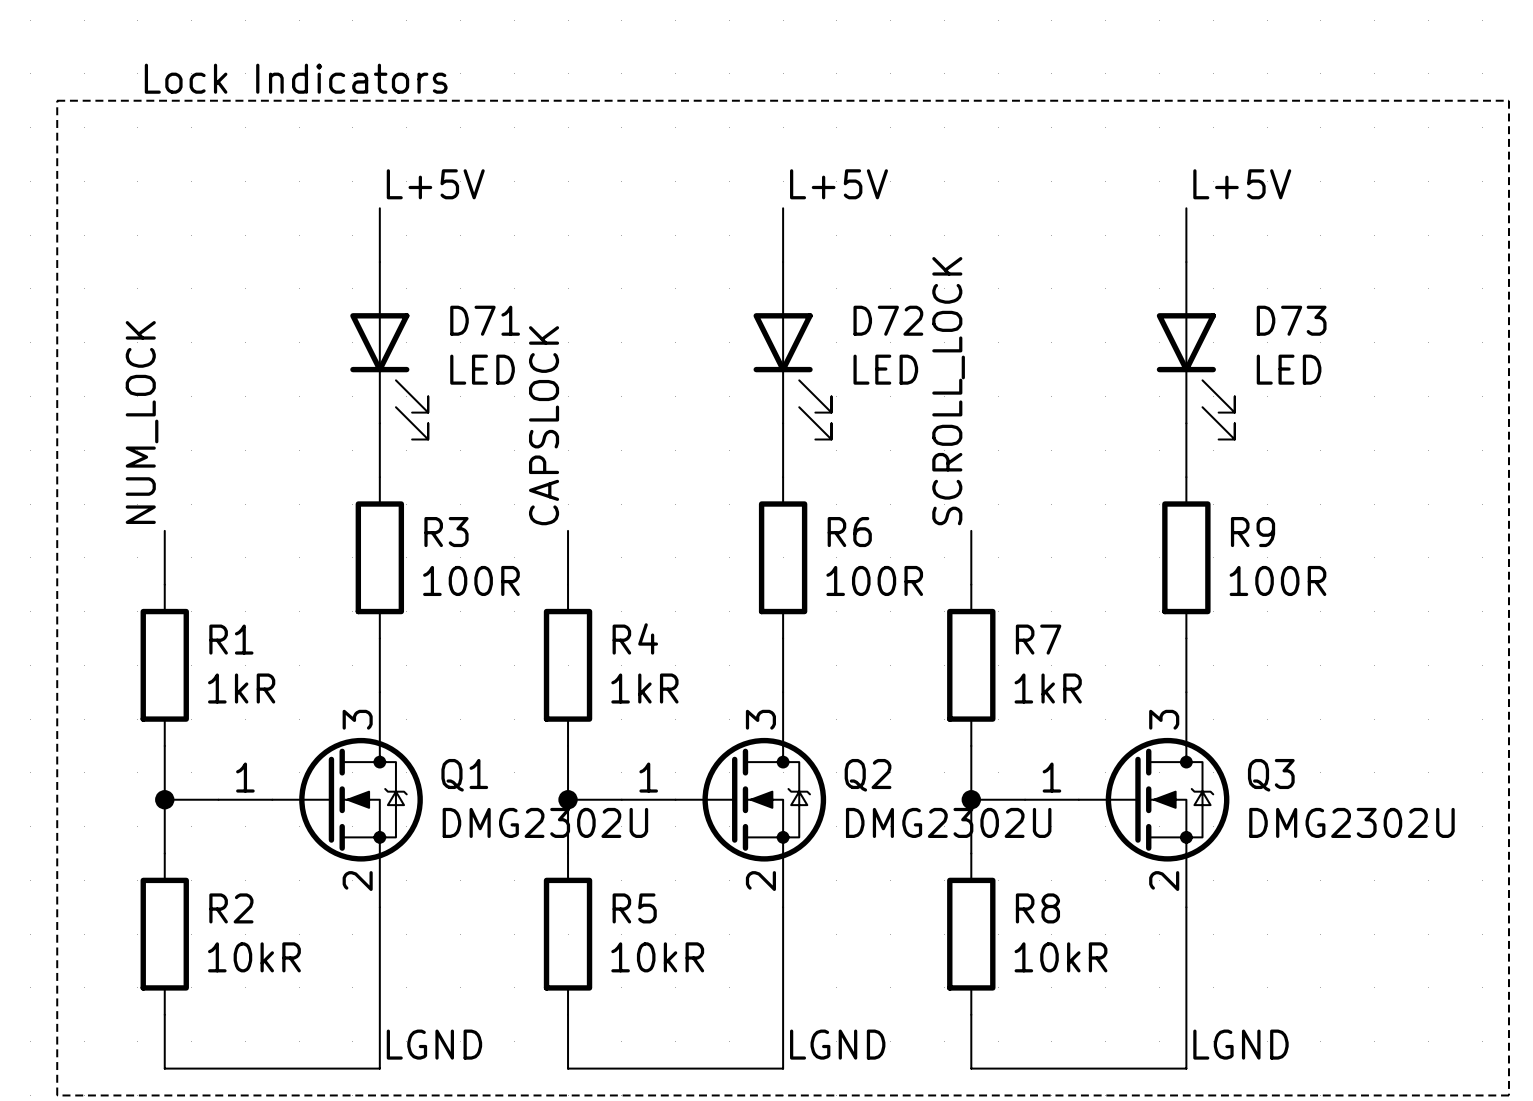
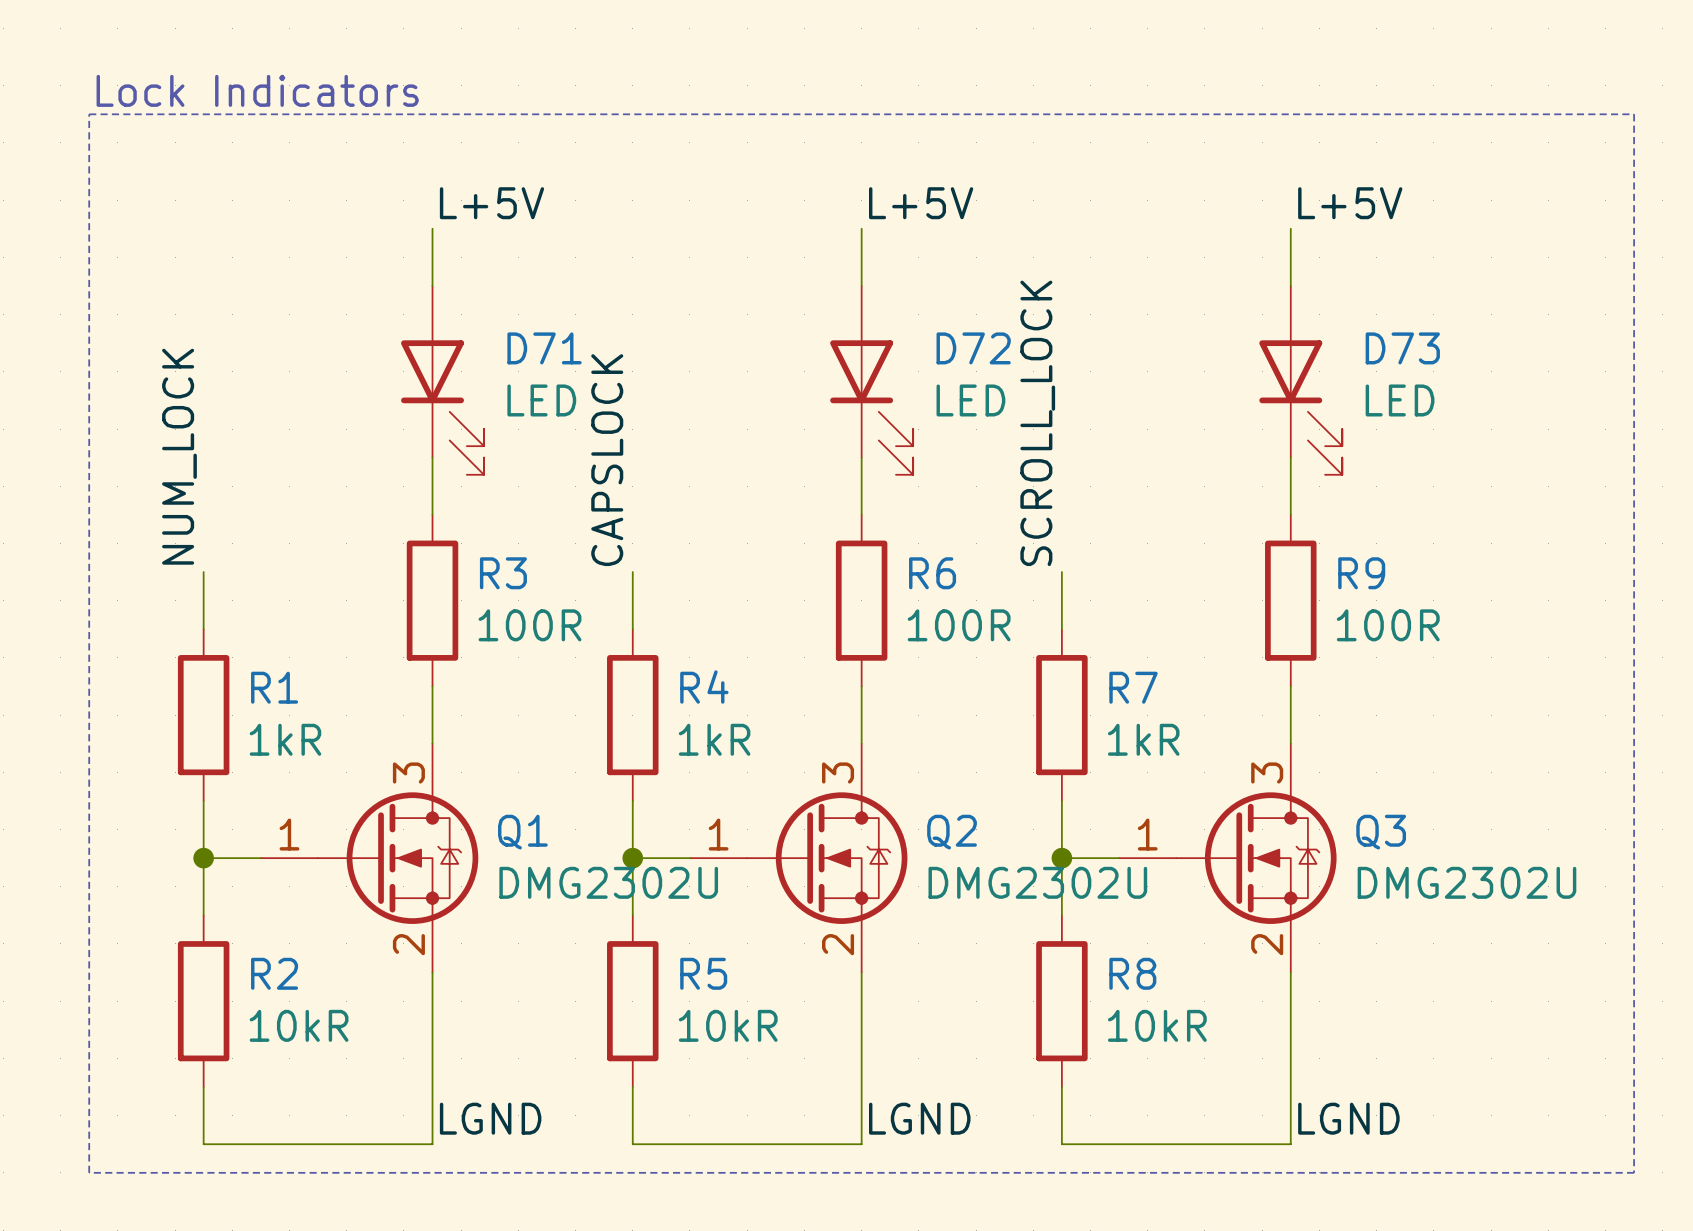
text position: Lock Indicators (296, 78) -> Lock Indicators (257, 90)

